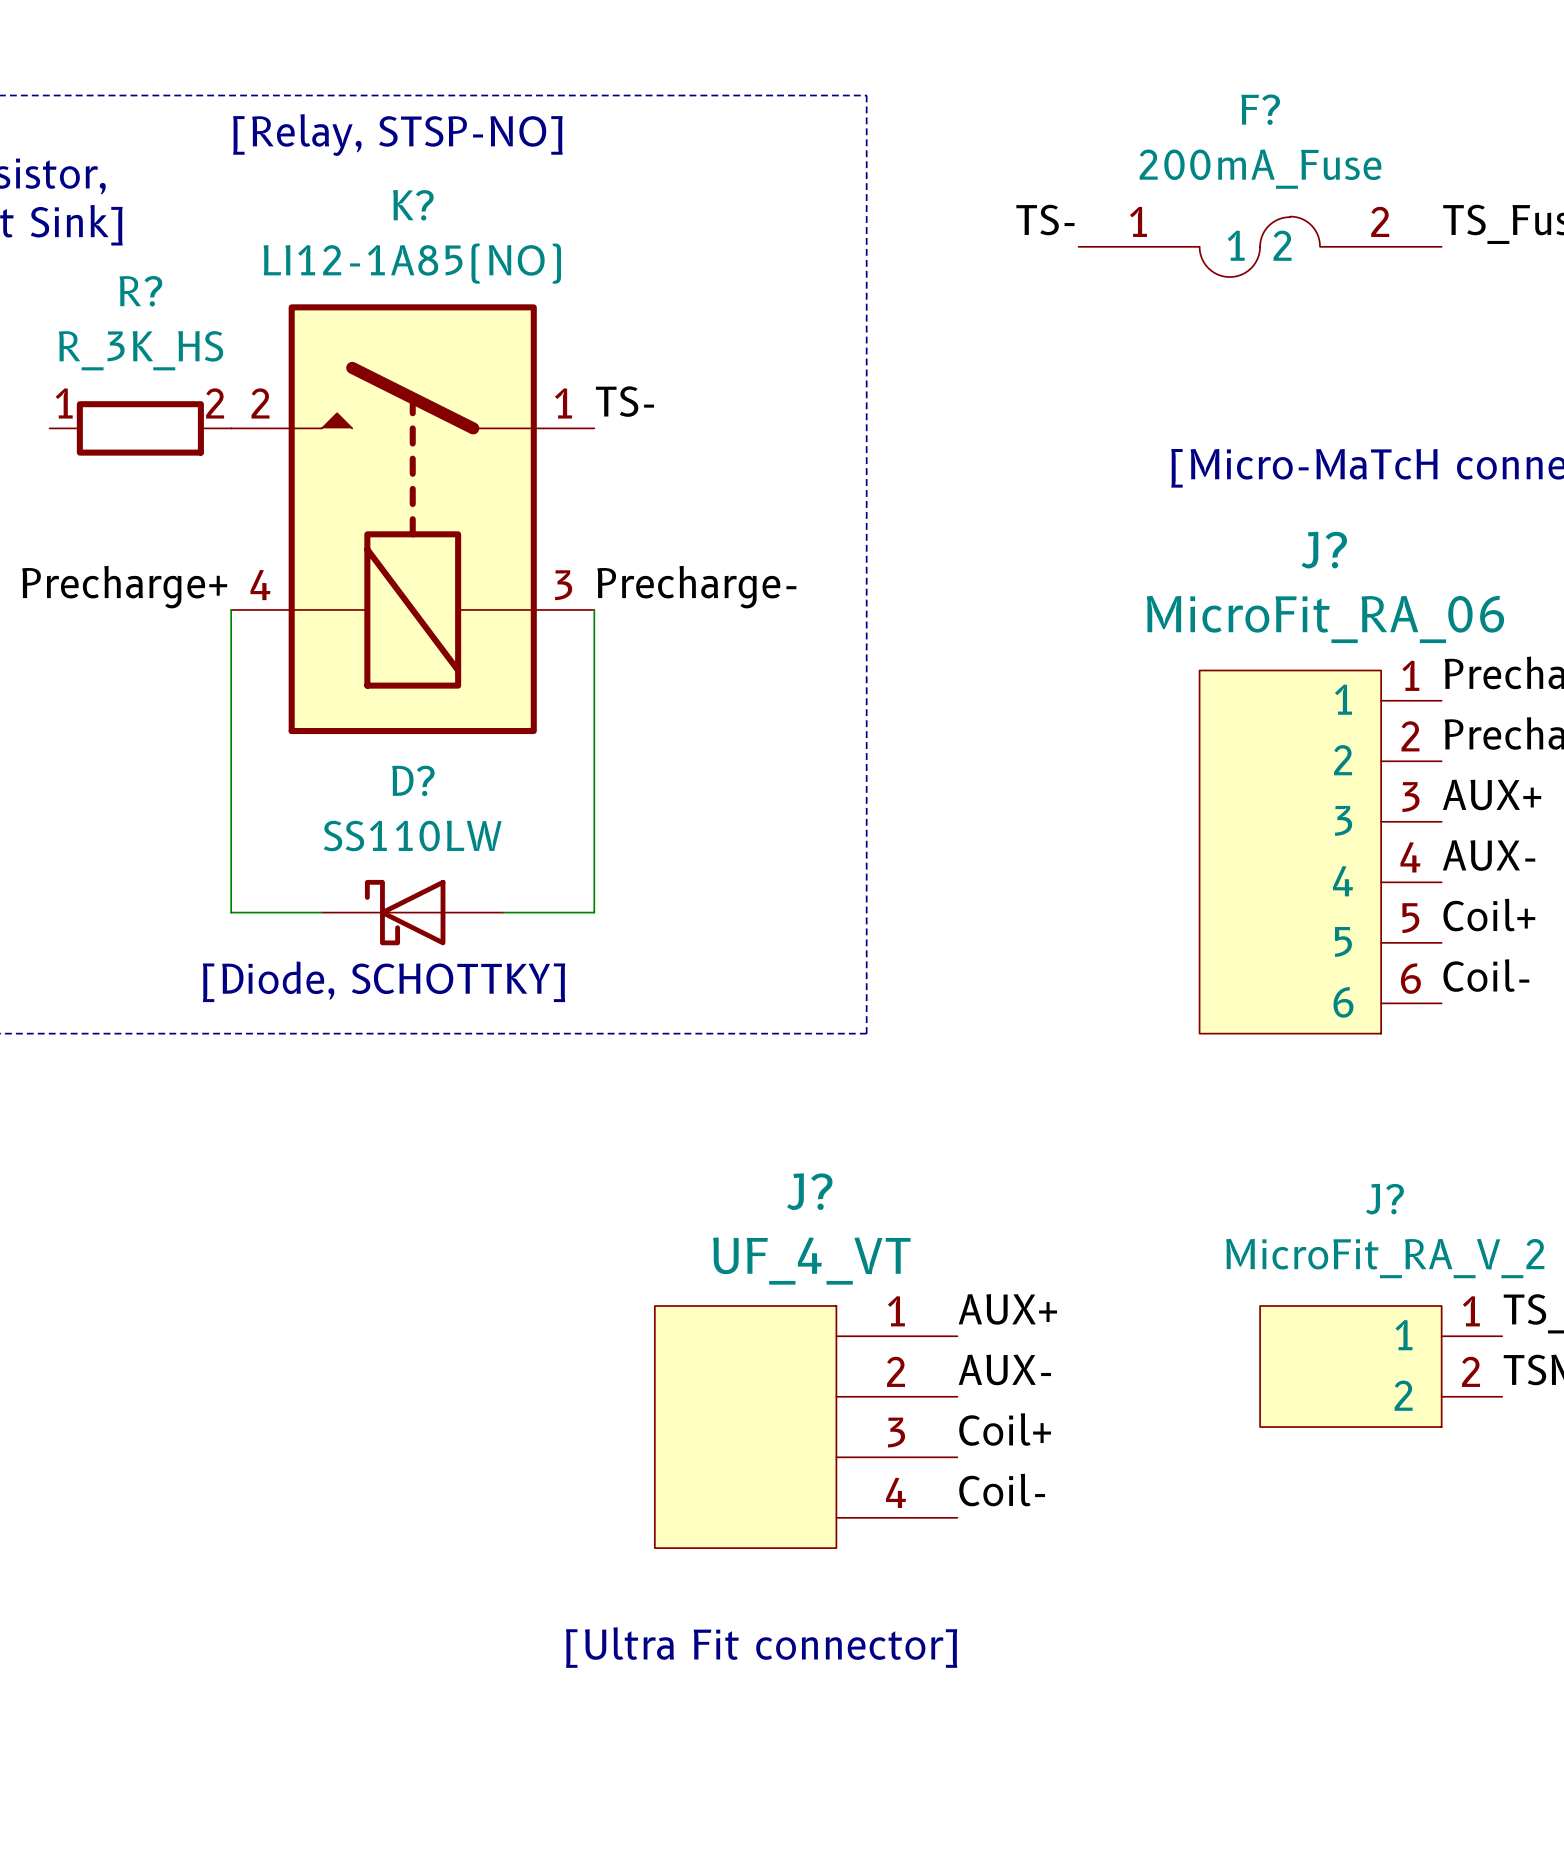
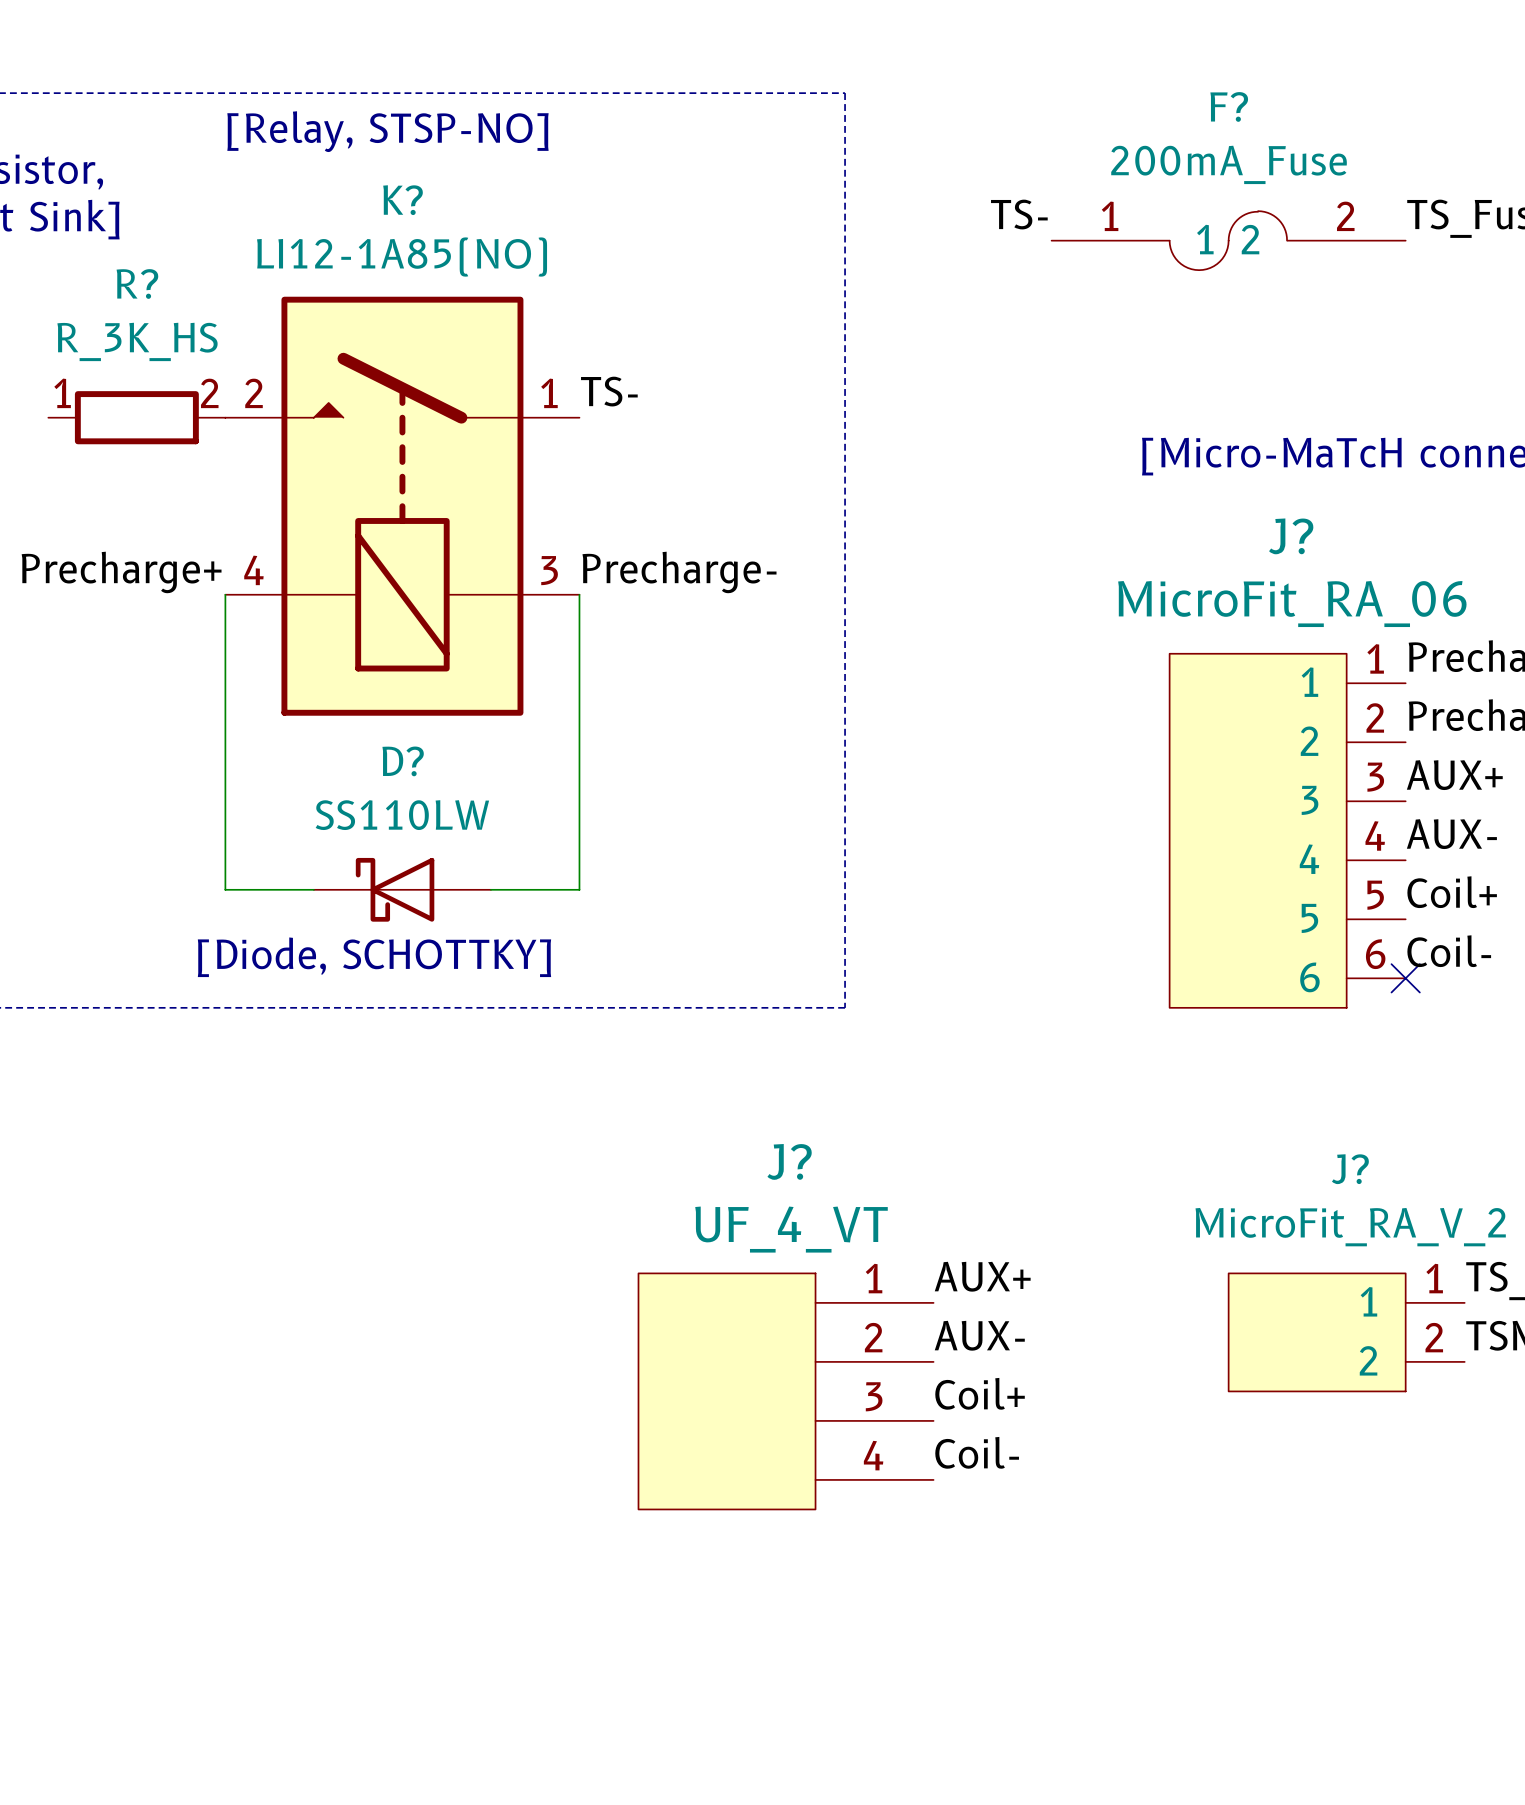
no-connect mark: none -> (1405, 978)
text: [Ultra Fit connector] (761, 1647) -> none

